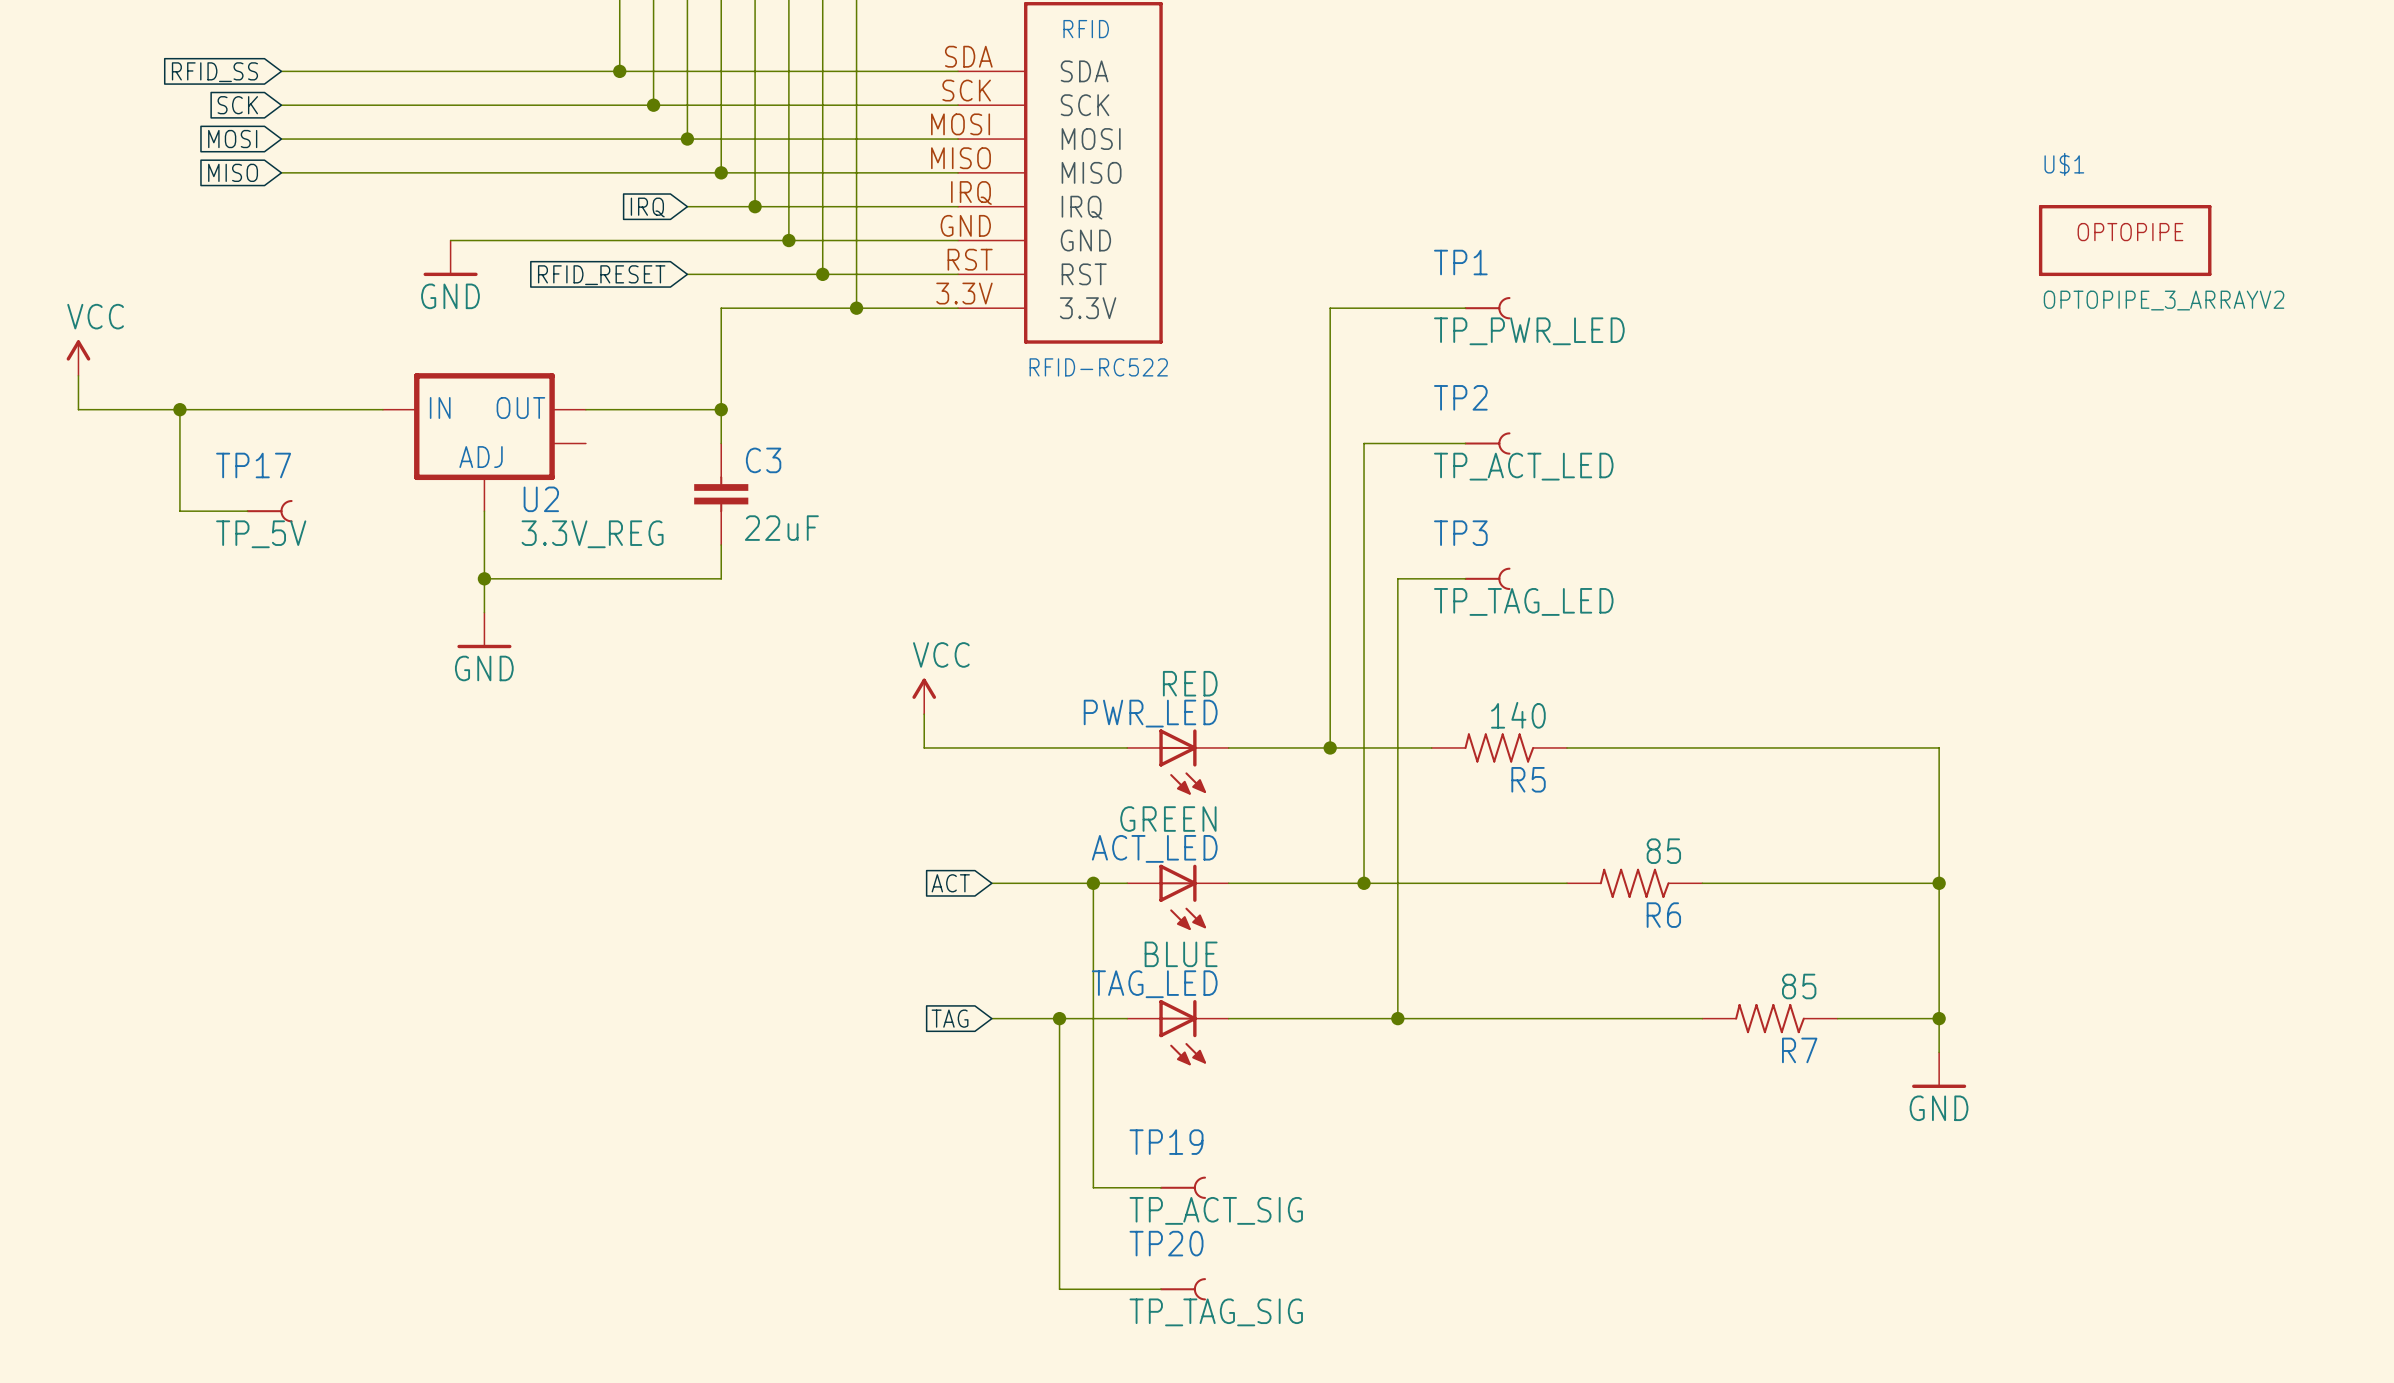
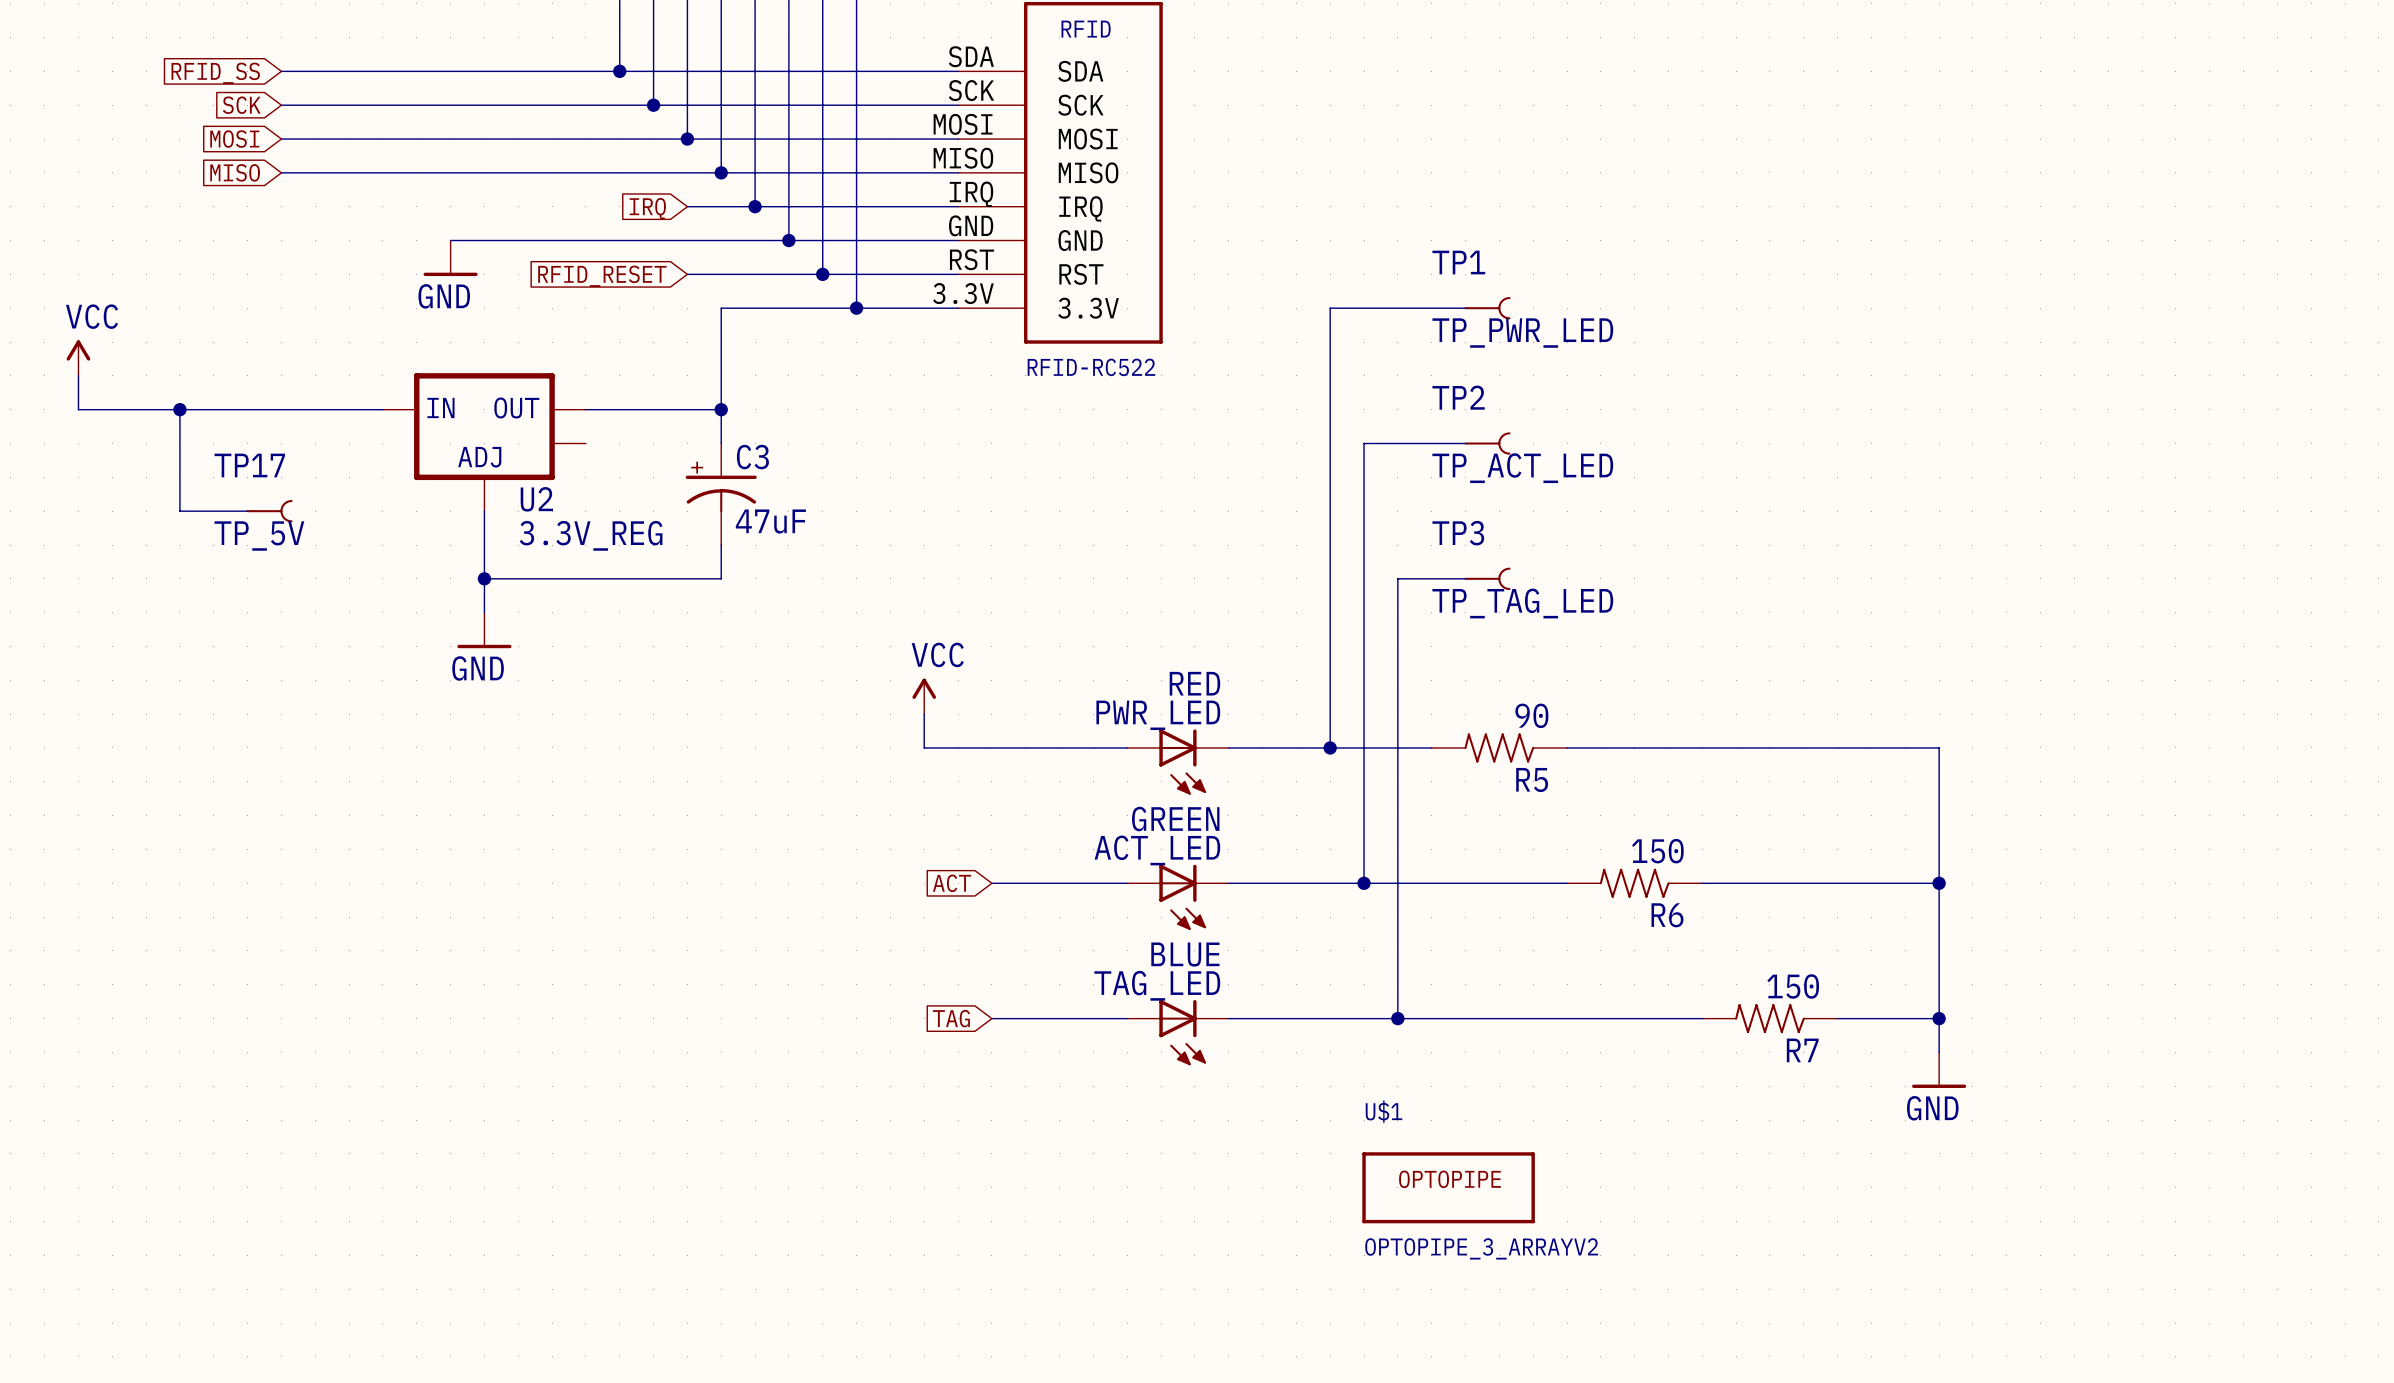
U$1 position: (2125, 240) -> (1448, 1187)
C3 symbol: [694, 443, 749, 546] -> [685, 443, 757, 546]
C3 value: 22uF (781, 528) -> 47uF (770, 521)
R5 value: 140 (1518, 715) -> 90 (1531, 715)
R6 value: 85 (1663, 851) -> 150 (1657, 851)
wire: (1093, 883) (1093, 1187) (1161, 1187) -> none
junction: (1093, 883) -> none
R7 value: 85 (1799, 986) -> 150 (1793, 986)
wire: (1059, 1018) (1059, 1289) (1161, 1289) -> none
junction: (1059, 1018) -> none
TP19: TP_ACT_SIG (1183, 1187) -> none
TP20: TP_TAG_SIG (1183, 1289) -> none

